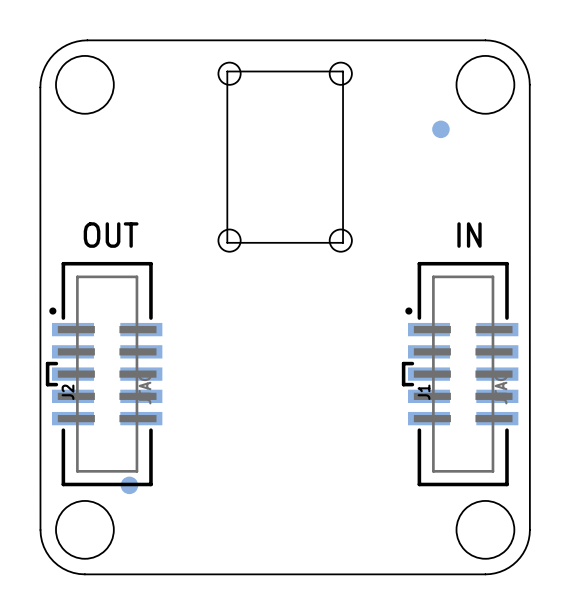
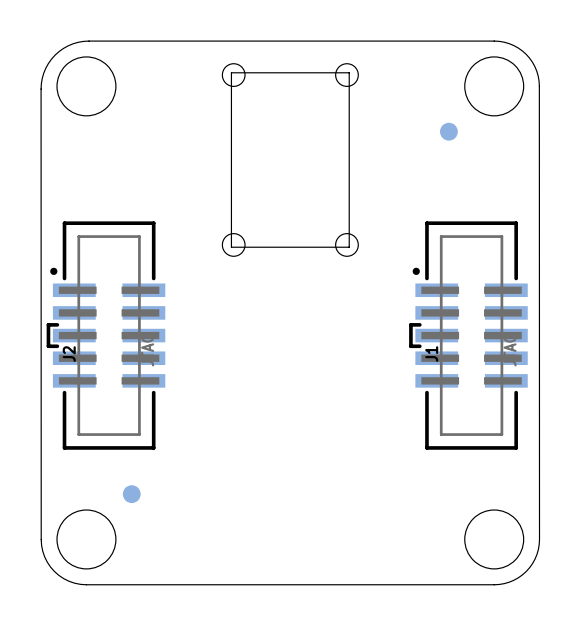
text: OUT (111, 235) -> none
text: IN (469, 235) -> none
J2 position: (104, 374) -> (105, 335)
J1 position: (460, 374) -> (468, 335)

